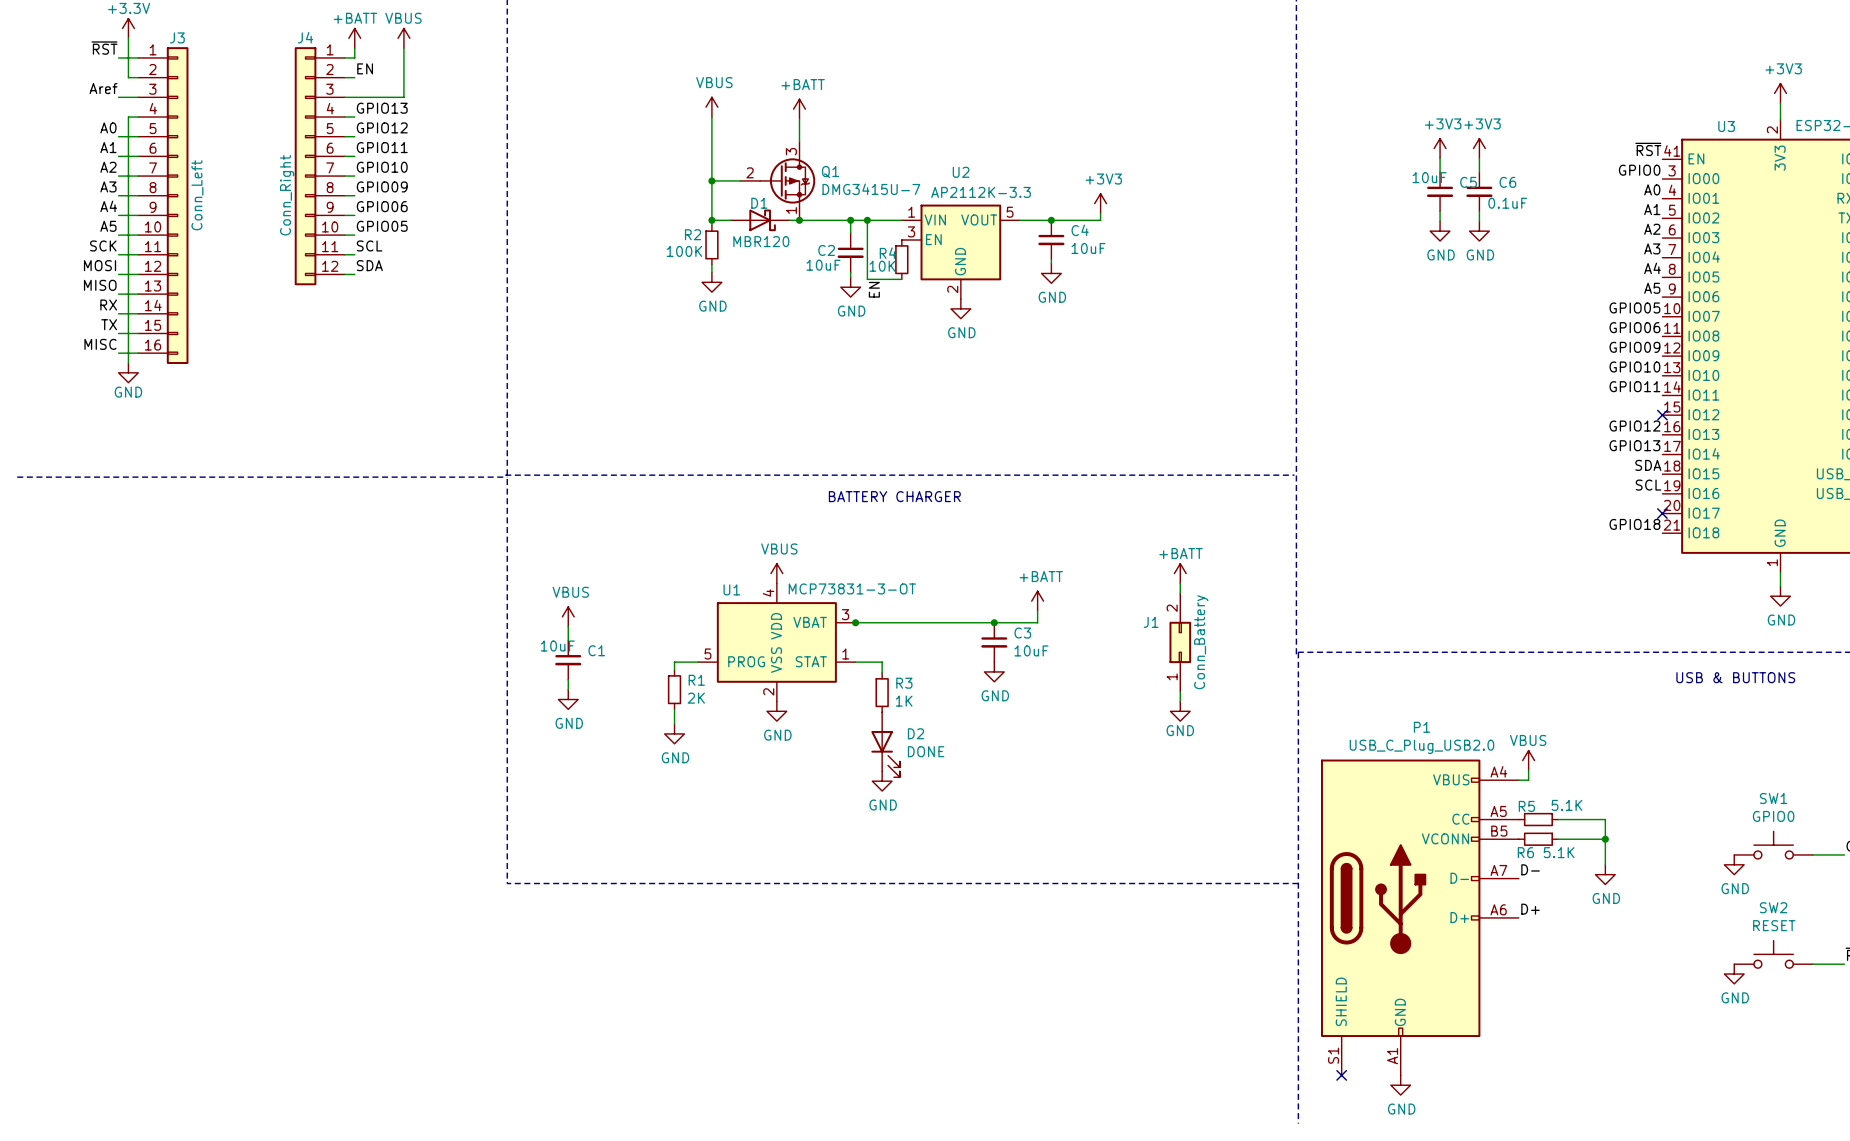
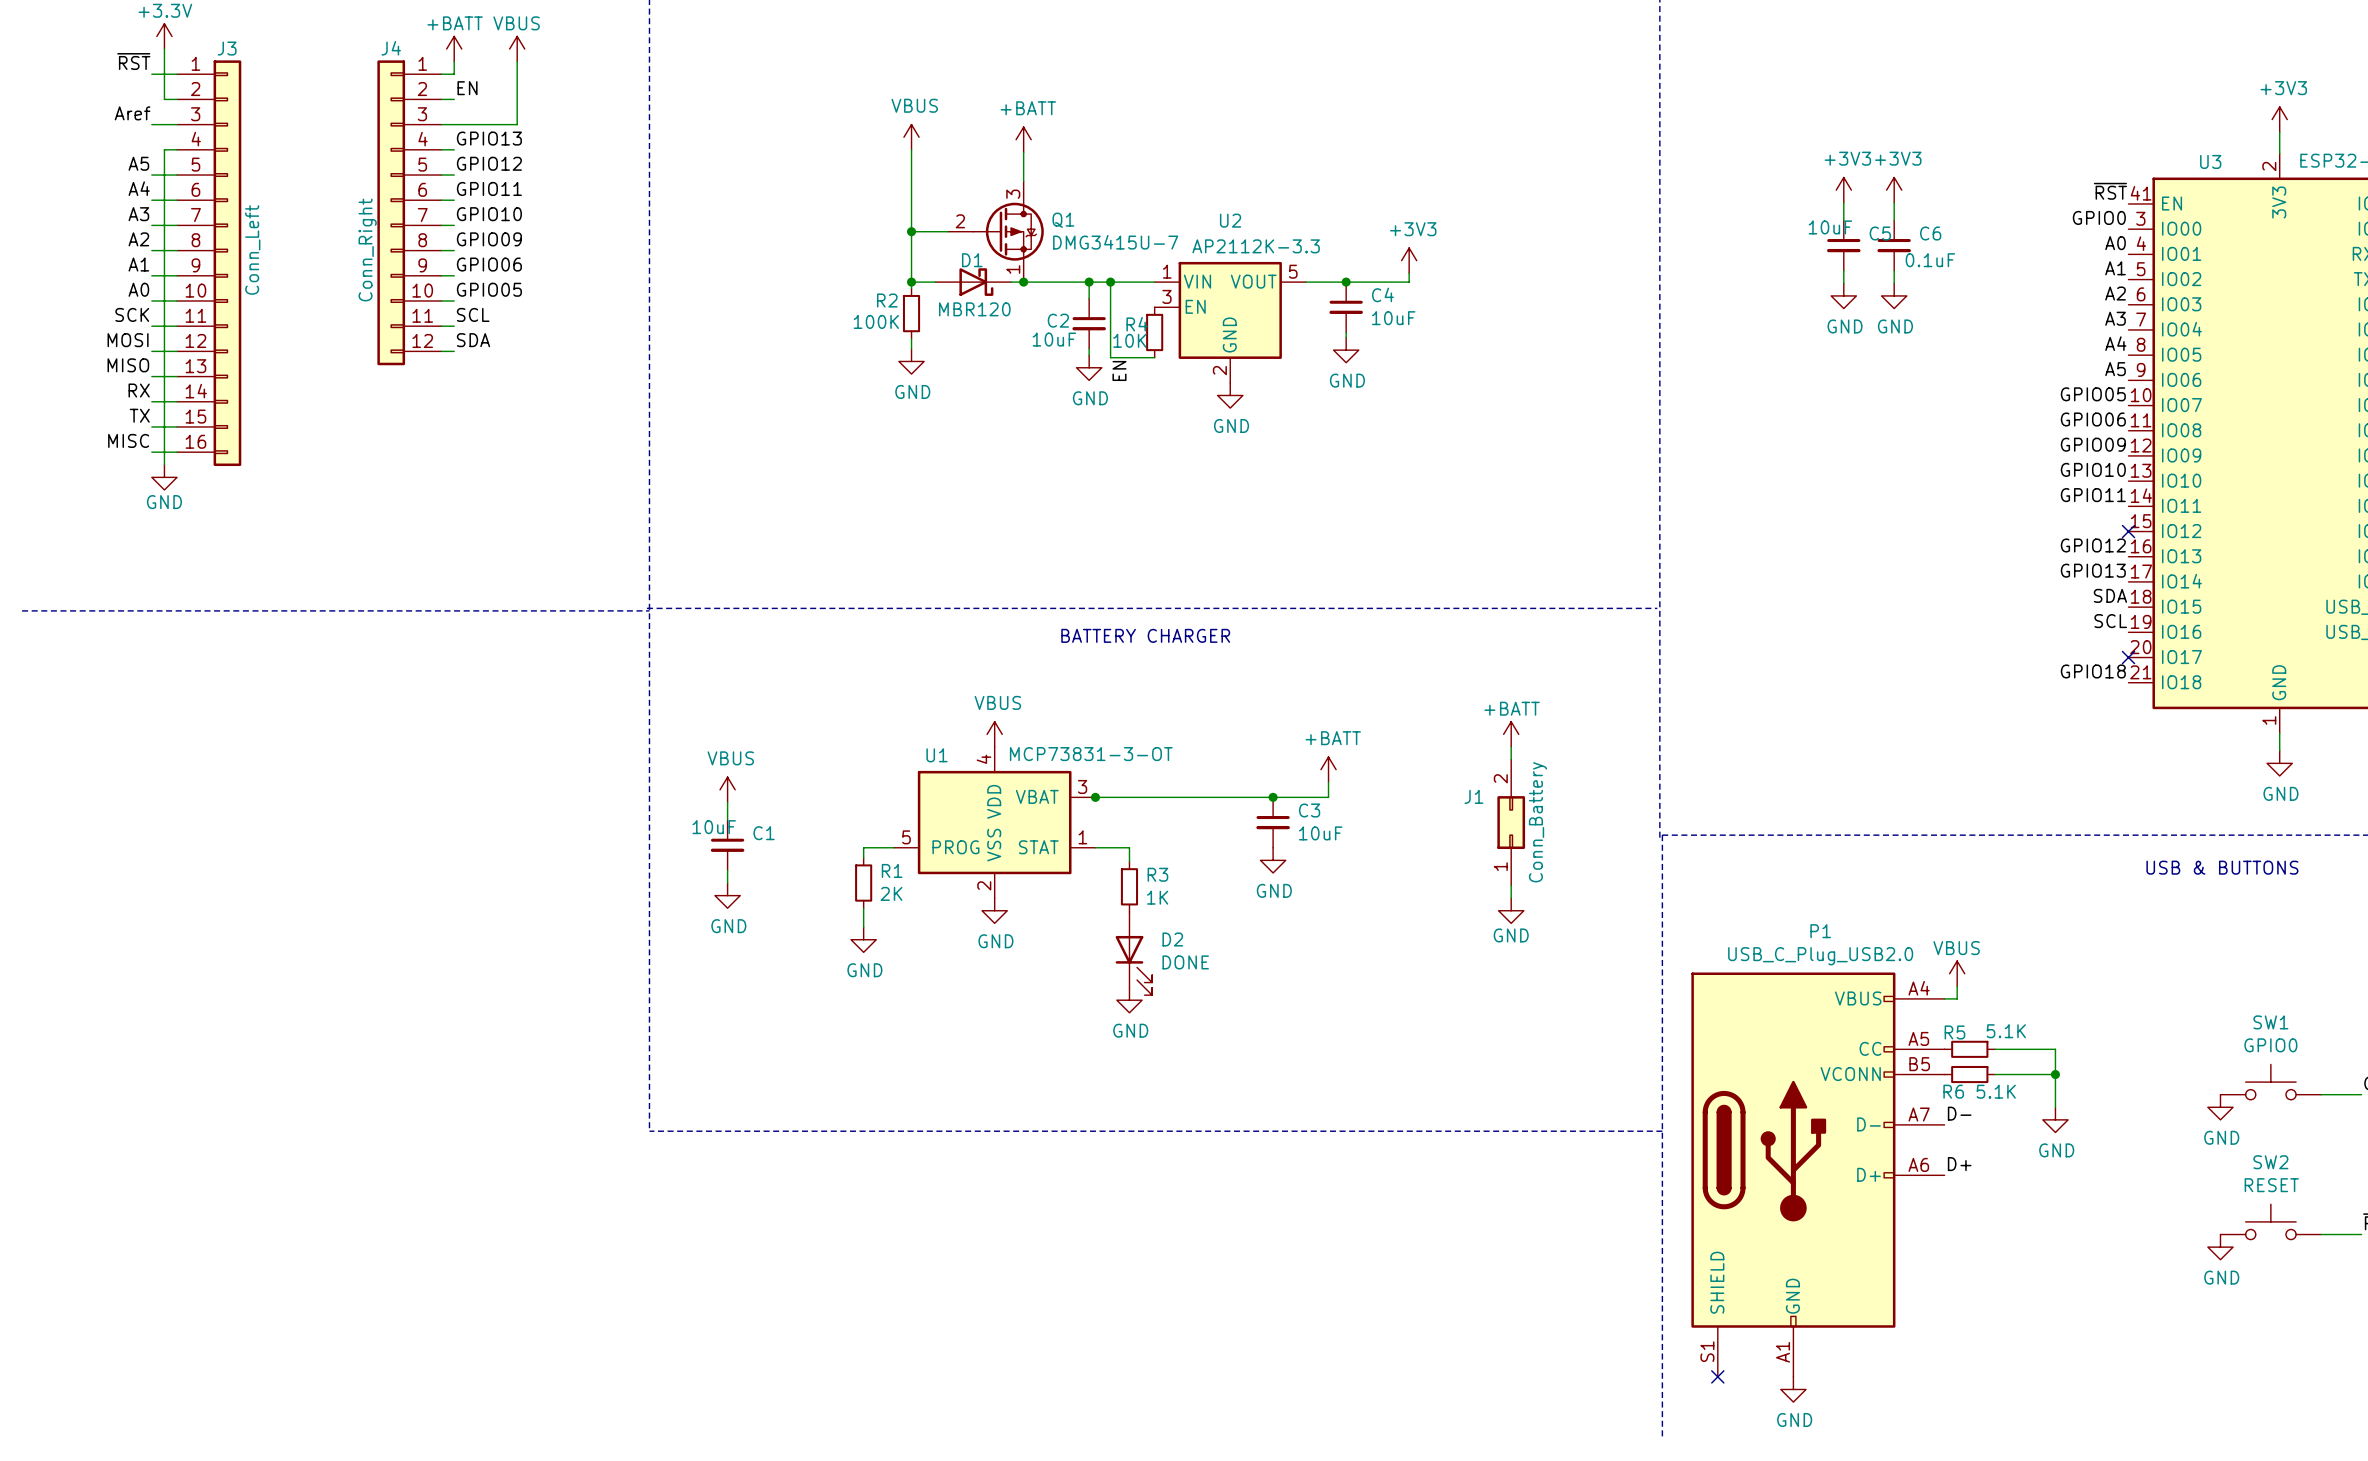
label: A0 (108, 127) -> A5 (138, 163)
label: A1 (108, 147) -> A4 (139, 188)
label: A2 (108, 167) -> A3 (138, 214)
label: A3 (108, 186) -> A2 (138, 239)
label: A4 (108, 206) -> A1 (138, 264)
label: A5 (108, 226) -> A0 (138, 289)

